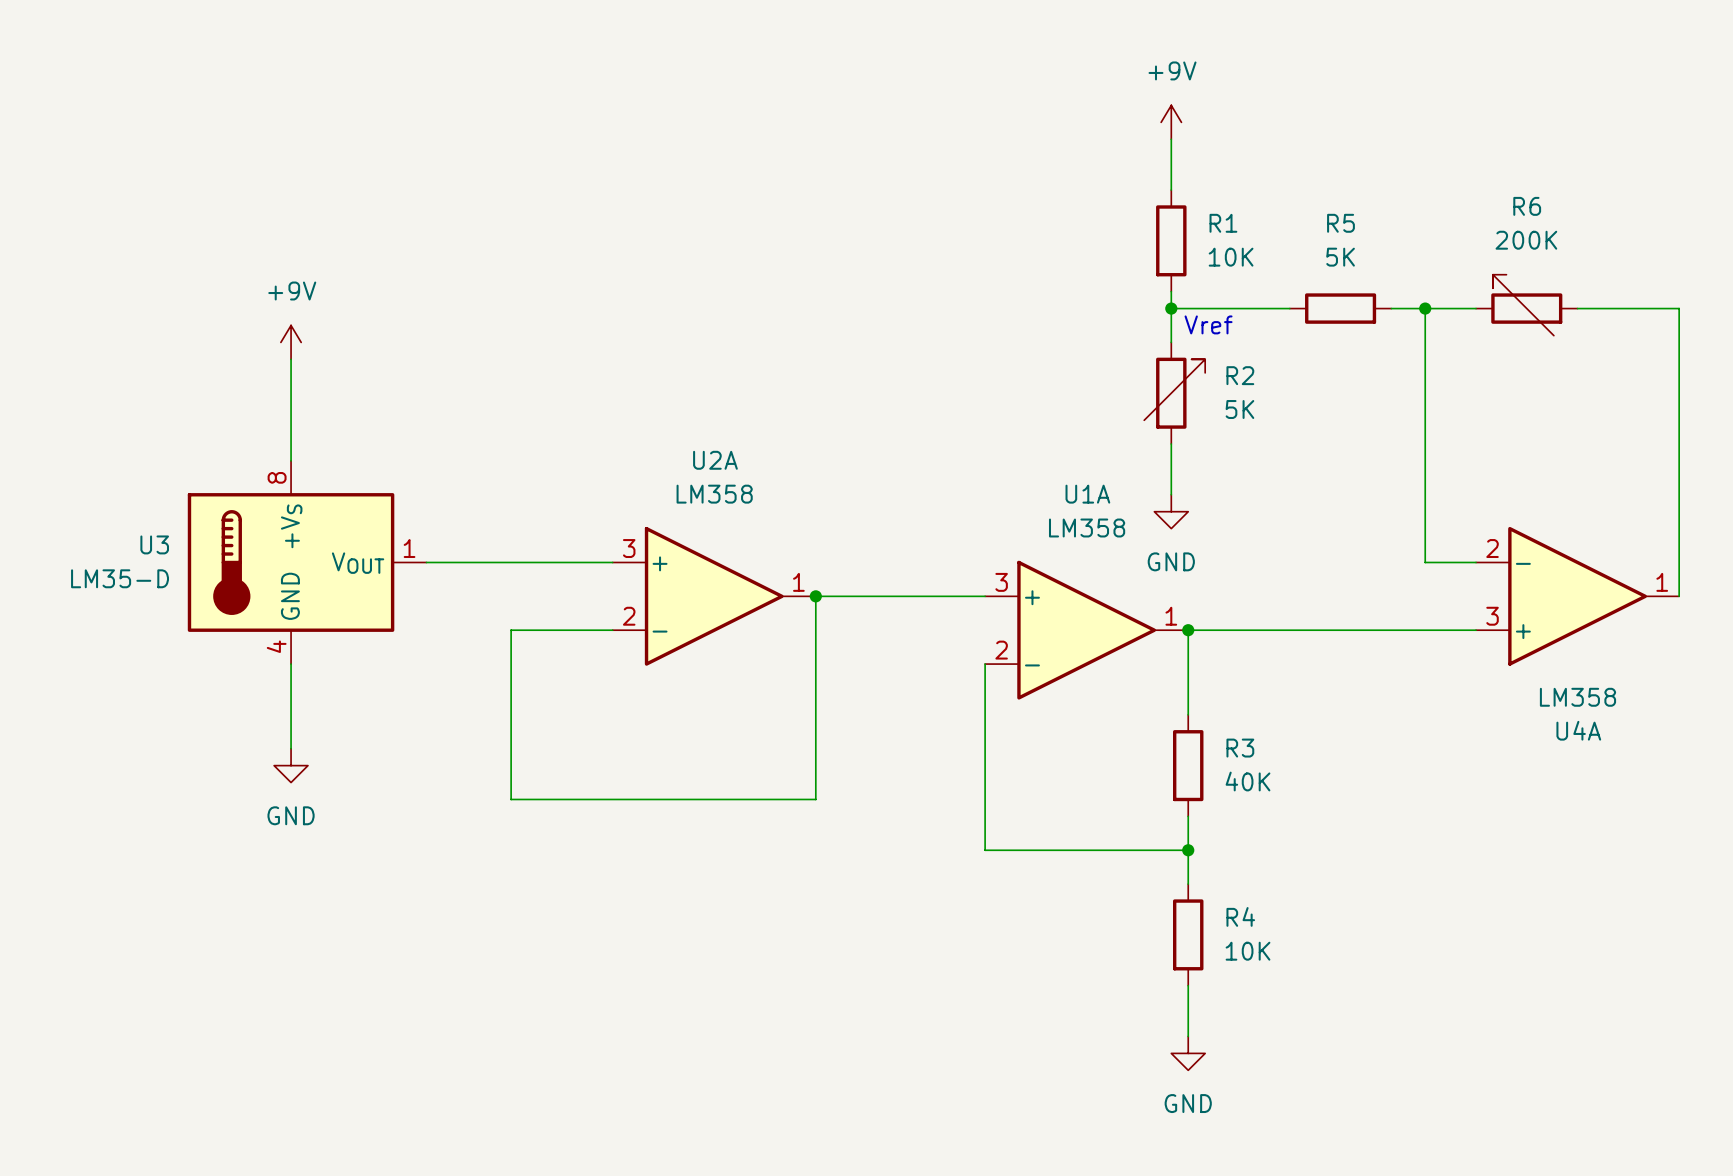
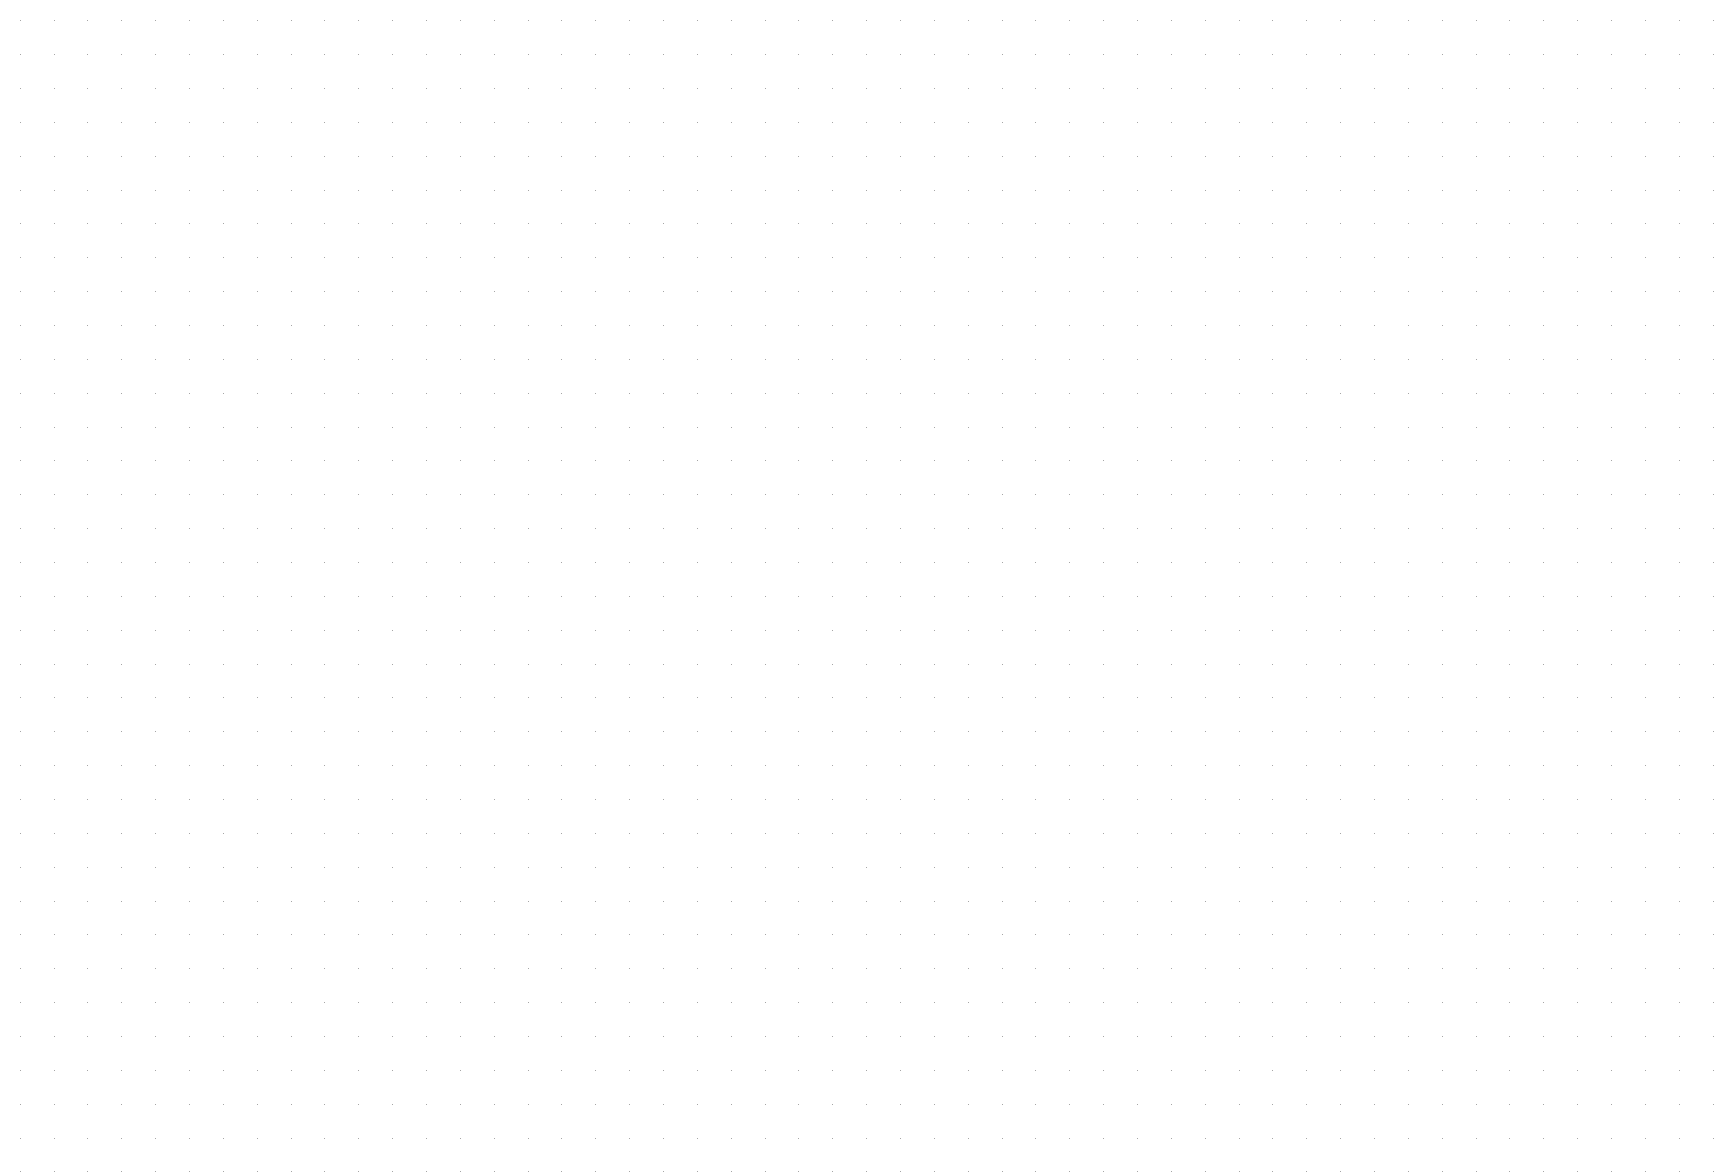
power symbol: +9V (1171, 122) -> none
wire: (1171, 139) (1171, 190) -> none
R1: 10K (1171, 240) -> none
wire: (1171, 291) (1171, 342) -> none
R6: 200K (1526, 305) -> none
wire: (1171, 308) (1289, 308) -> none
junction: (1171, 308) -> none
R5: 5K (1340, 308) -> none
wire: (1391, 308) (1476, 308) -> none
wire: (1425, 308) (1425, 562) (1476, 562) -> none
junction: (1425, 308) -> none
wire: (1577, 308) (1679, 308) (1679, 596) -> none
text: Vref (1208, 324) -> none
power symbol: +9V (291, 342) -> none
wire: (291, 359) (291, 460) -> none
R2: 5K (1174, 393) -> none
wire: (1171, 443) (1171, 494) -> none
power symbol: GND (1171, 511) -> none
U3: LM35-D (307, 562) -> none
wire: (426, 562) (612, 562) -> none
U2A: LM358 (714, 596) -> none
junction: (815, 596) -> none
wire: (985, 596) (815, 596) (815, 799) (511, 799) (511, 630) (612, 630) -> none
U4A: LM358 (1577, 596) -> none
U1A: LM358 (1086, 630) -> none
junction: (1188, 630) -> none
wire: (1476, 630) (1188, 630) (1188, 714) -> none
wire: (291, 664) (291, 748) -> none
wire: (985, 664) (985, 850) (1188, 850) -> none
power symbol: GND (291, 765) -> none
R3: 40K (1188, 765) -> none
wire: (1188, 816) (1188, 884) -> none
junction: (1188, 850) -> none
R4: 10K (1188, 934) -> none
wire: (1188, 985) (1188, 1036) -> none
power symbol: GND (1188, 1053) -> none

